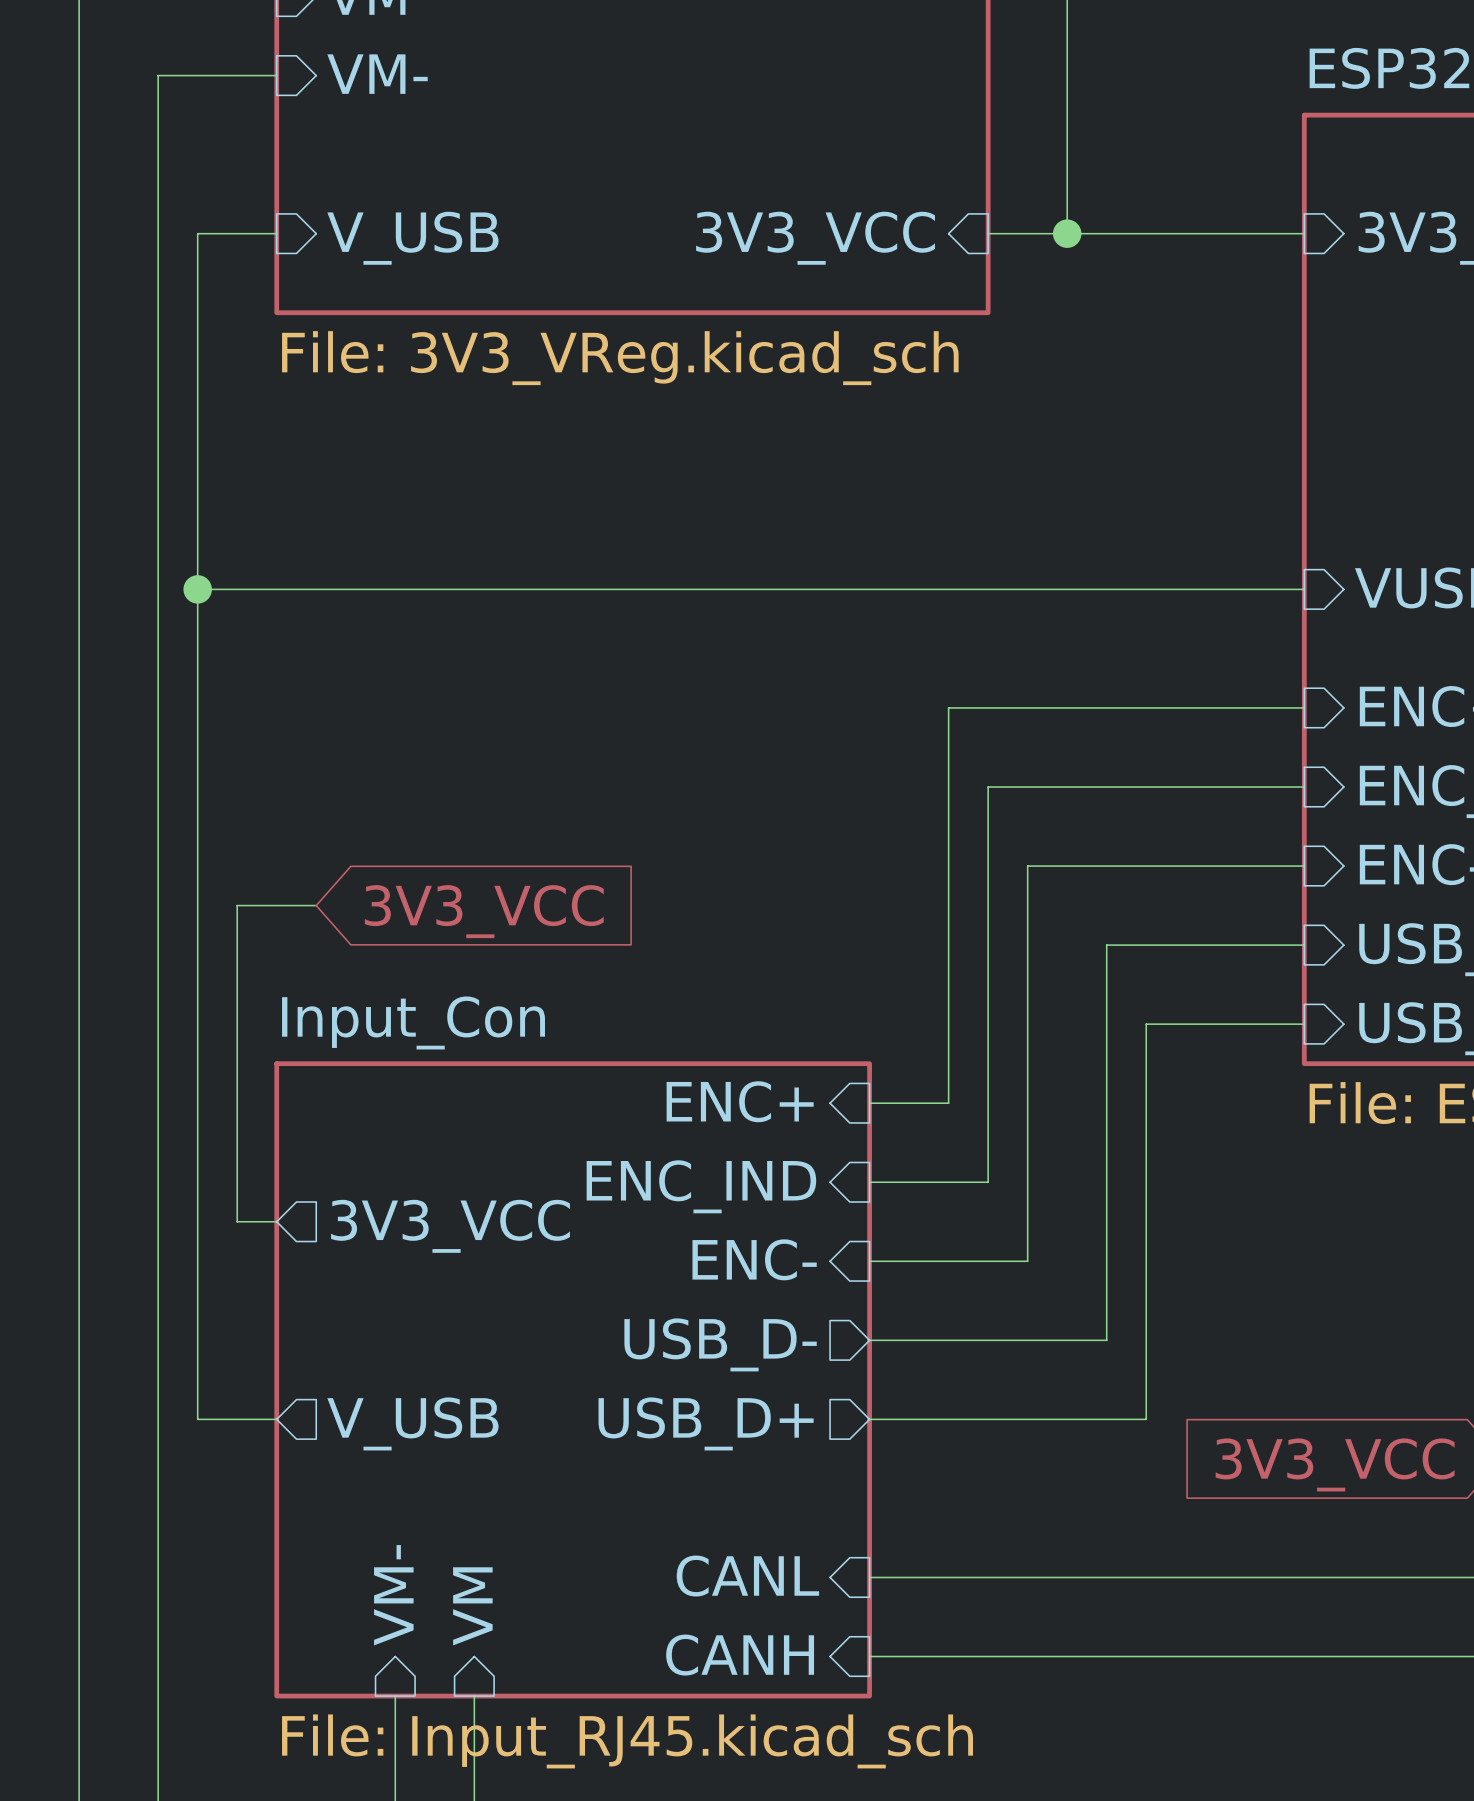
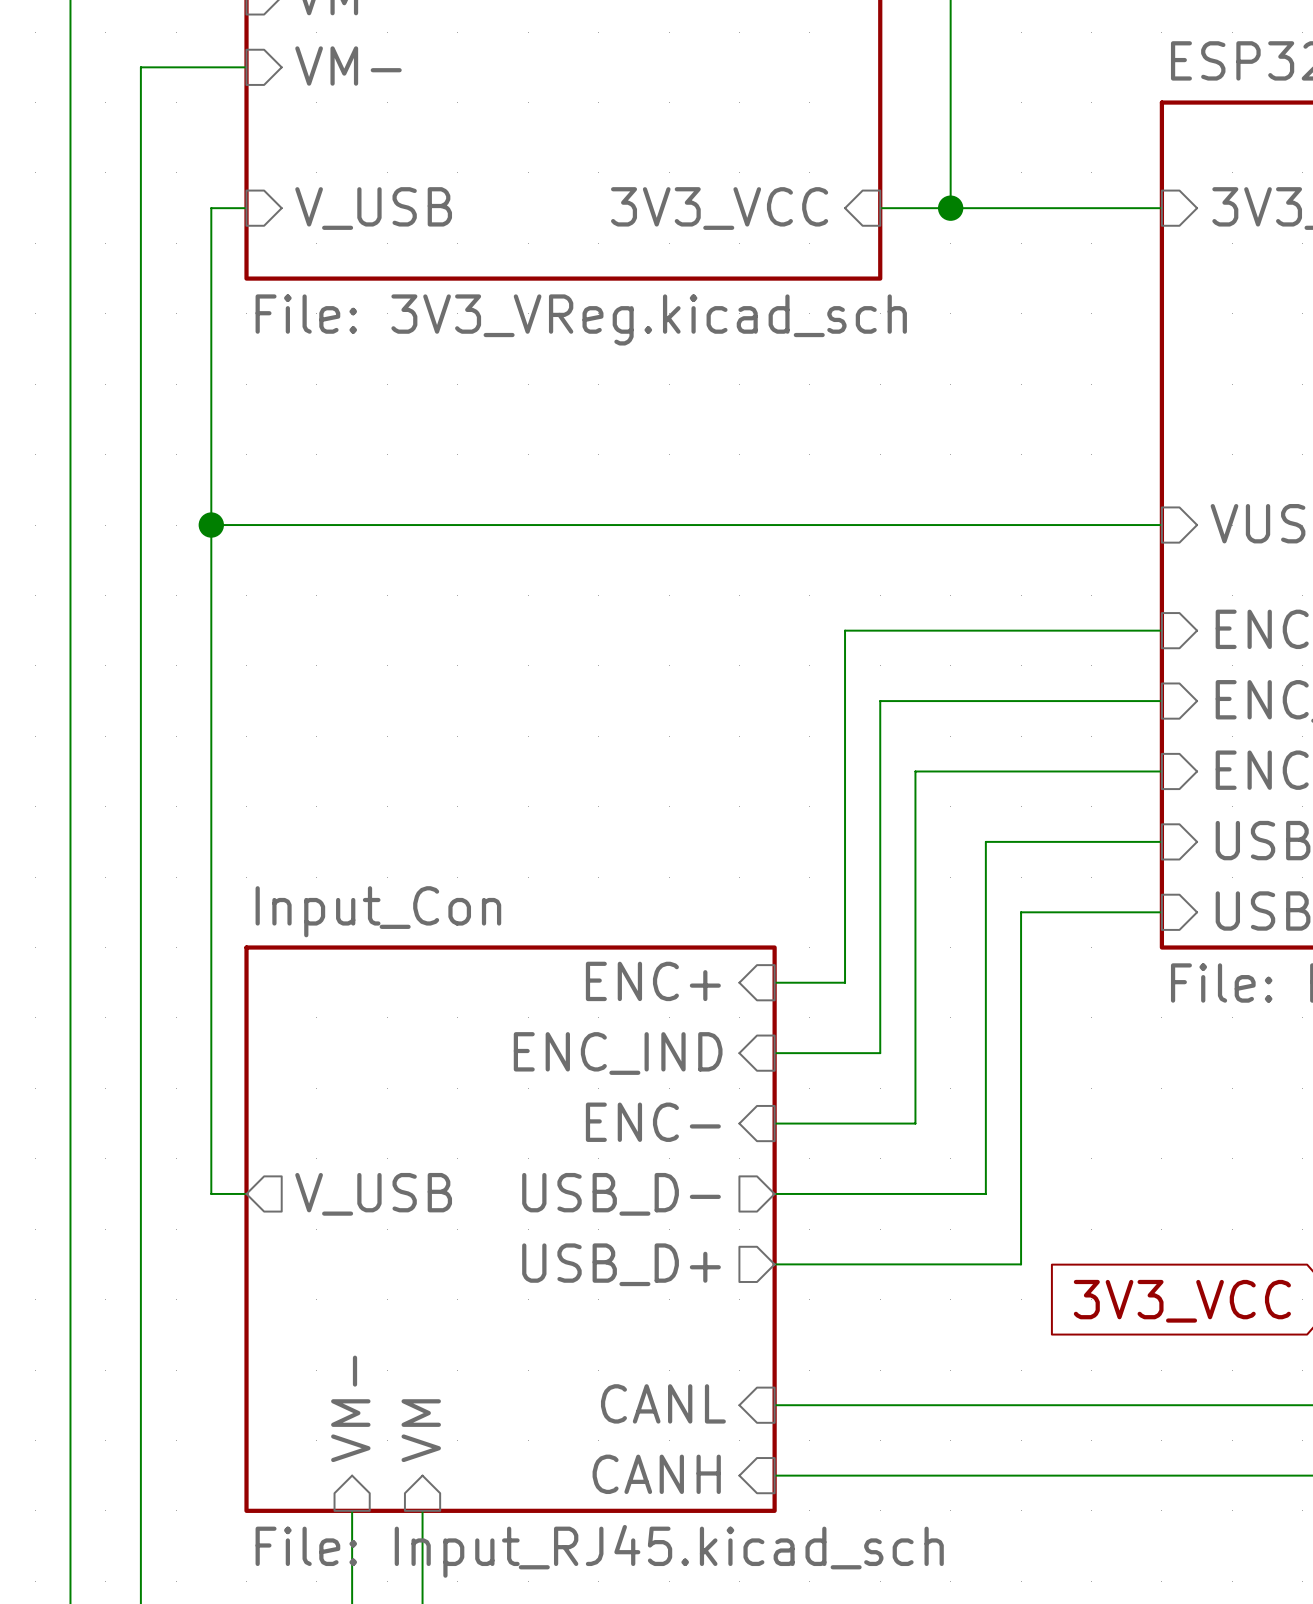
wire: (237, 233) (197, 233) (197, 1419) (276, 1419) -> (211, 208) (211, 806)
wire: (197, 589) (237, 589) -> none
junction position: (197, 589) -> (211, 525)
wire: (237, 905) (316, 905) -> none
global label: 3V3_VCC (484, 911) -> none
wire: (237, 1221) (276, 1221) -> (211, 1088) (211, 1193) (246, 1193)
sheet pin: 3V3_VCC (450, 1226) -> none
sheet pin position: V_USB (412, 1423) -> V_USB (373, 1194)

